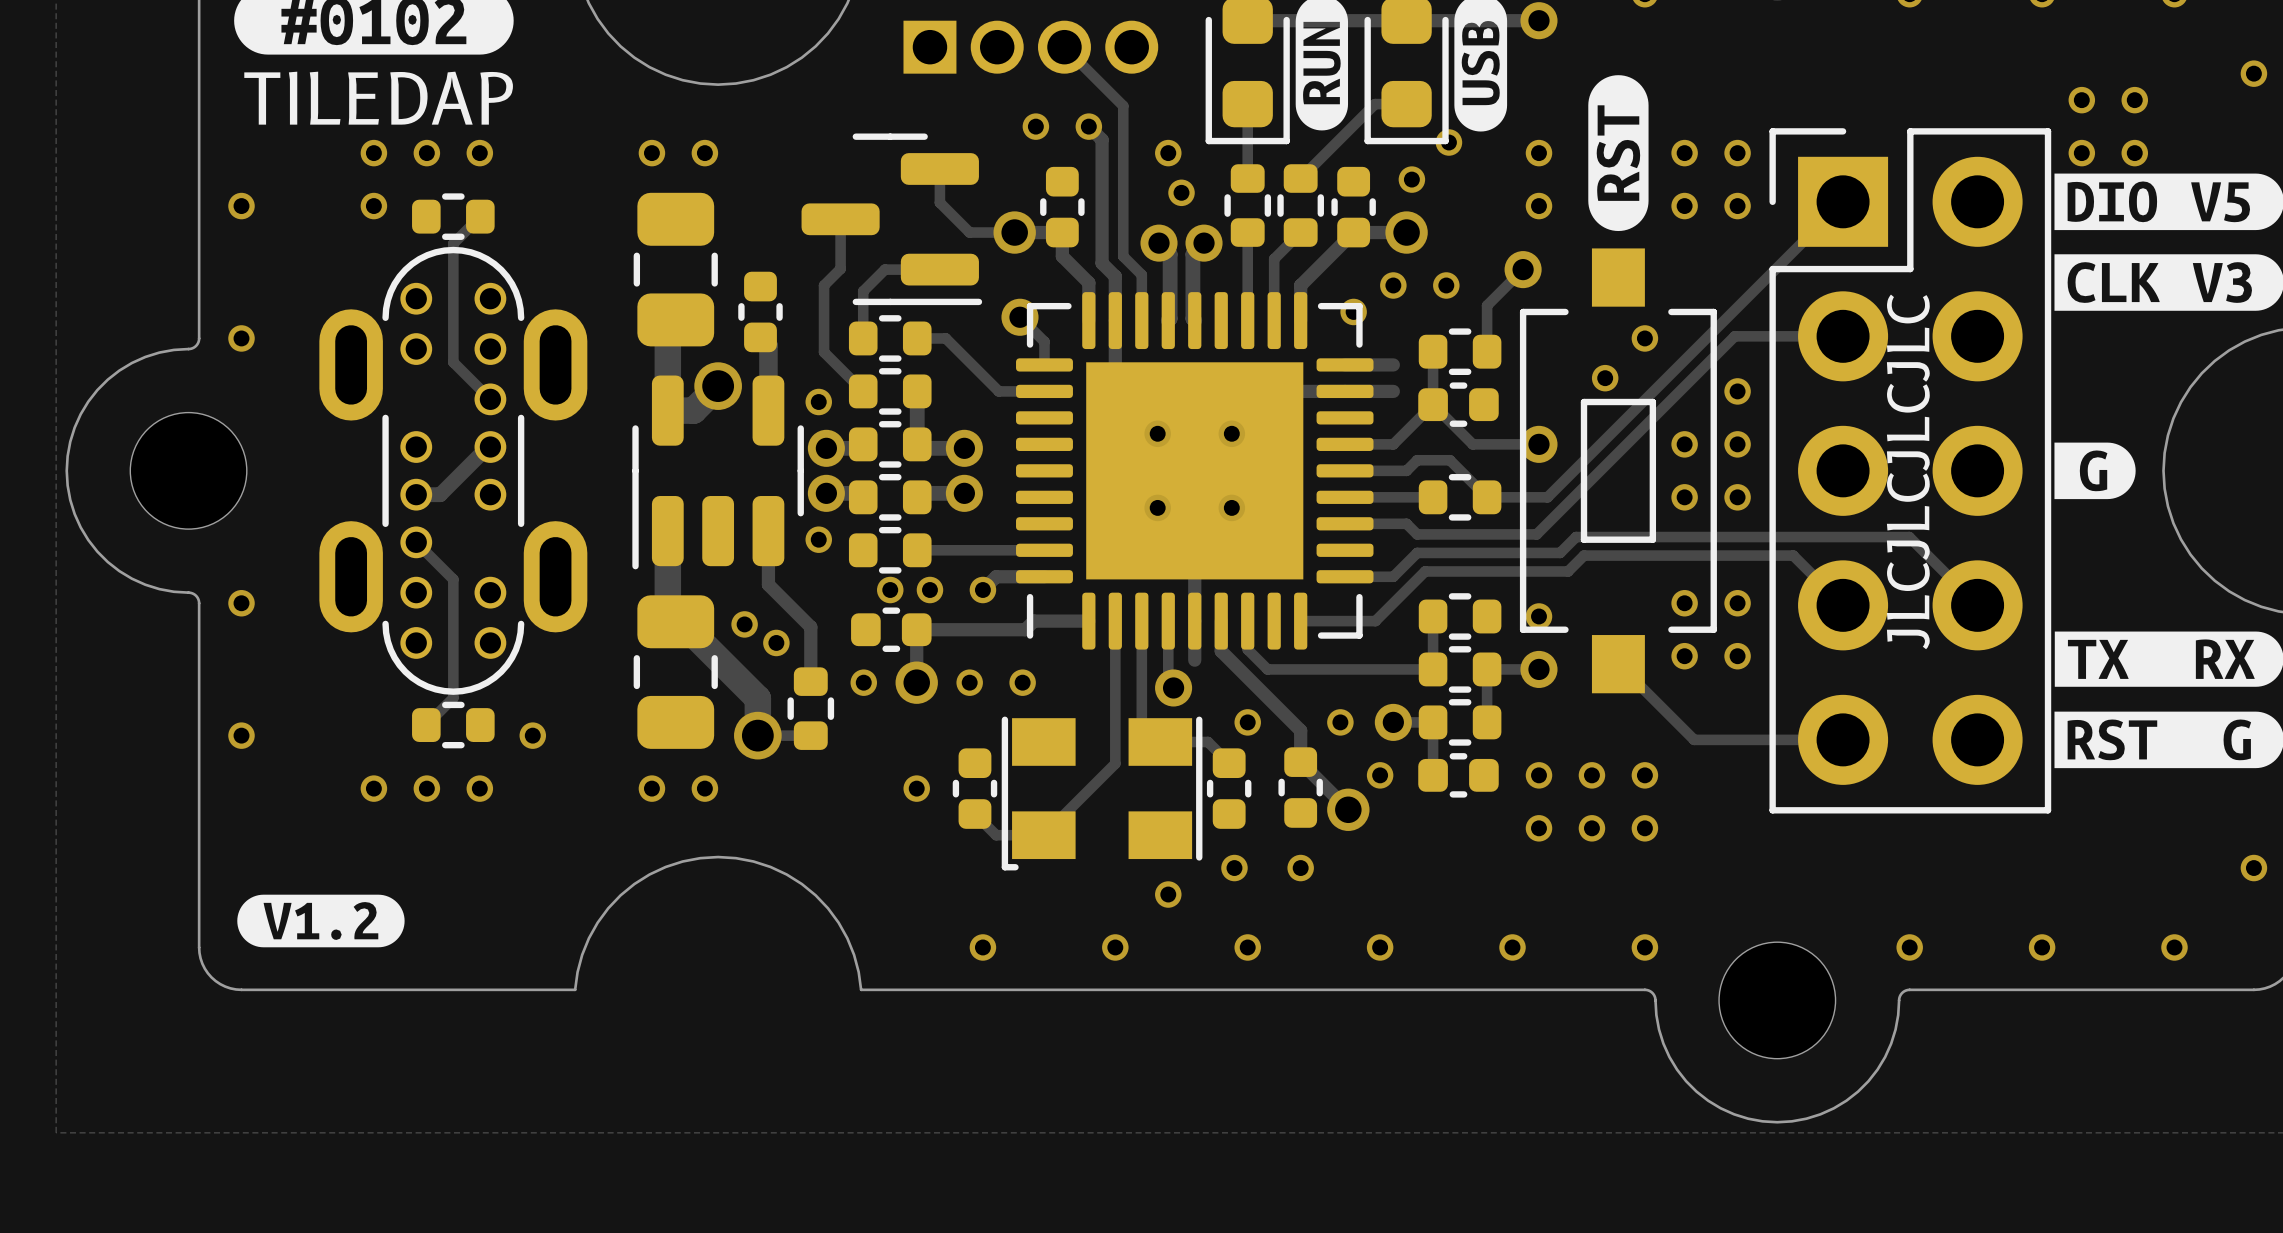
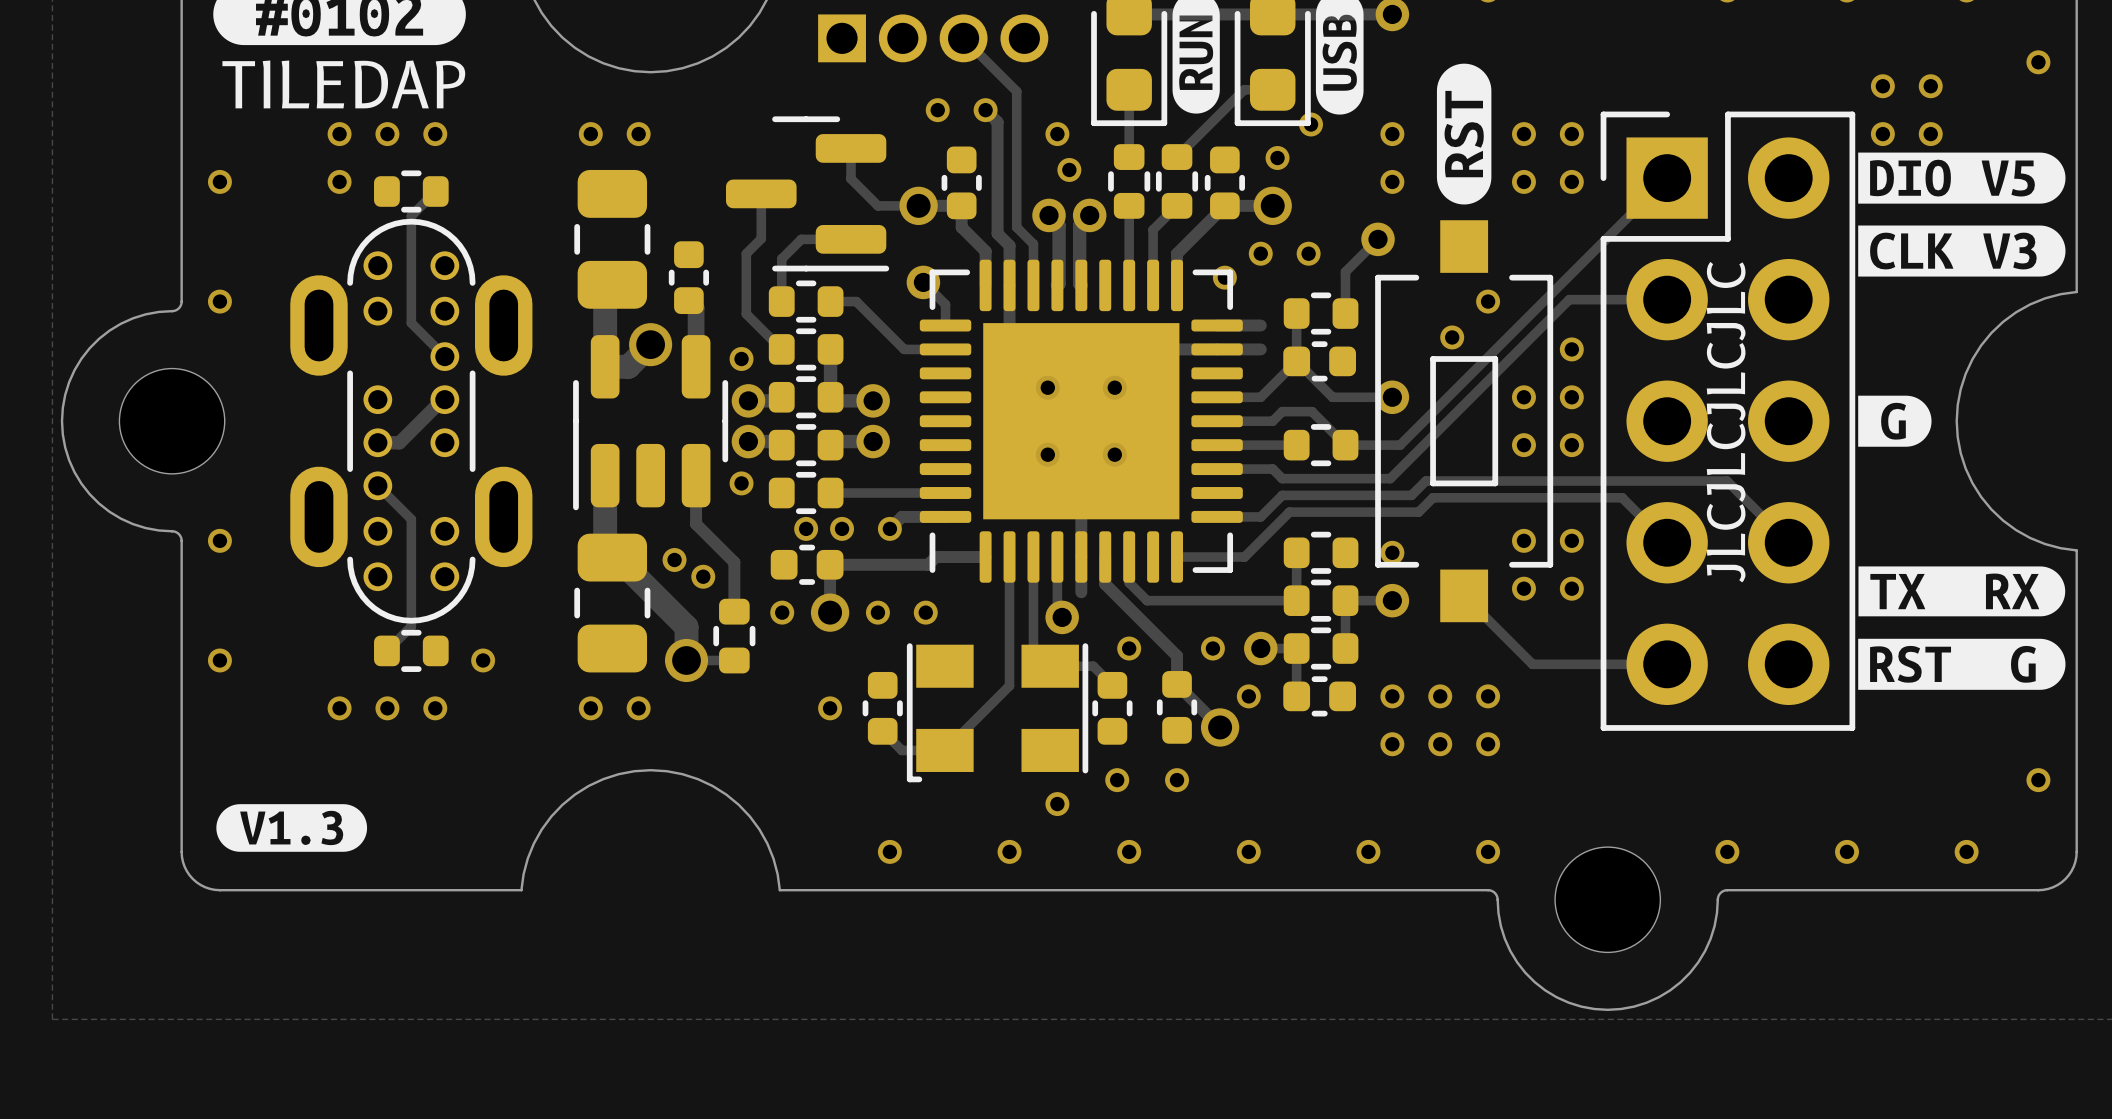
drawing shape: [237, 894, 405, 948] -> [216, 804, 368, 852]

